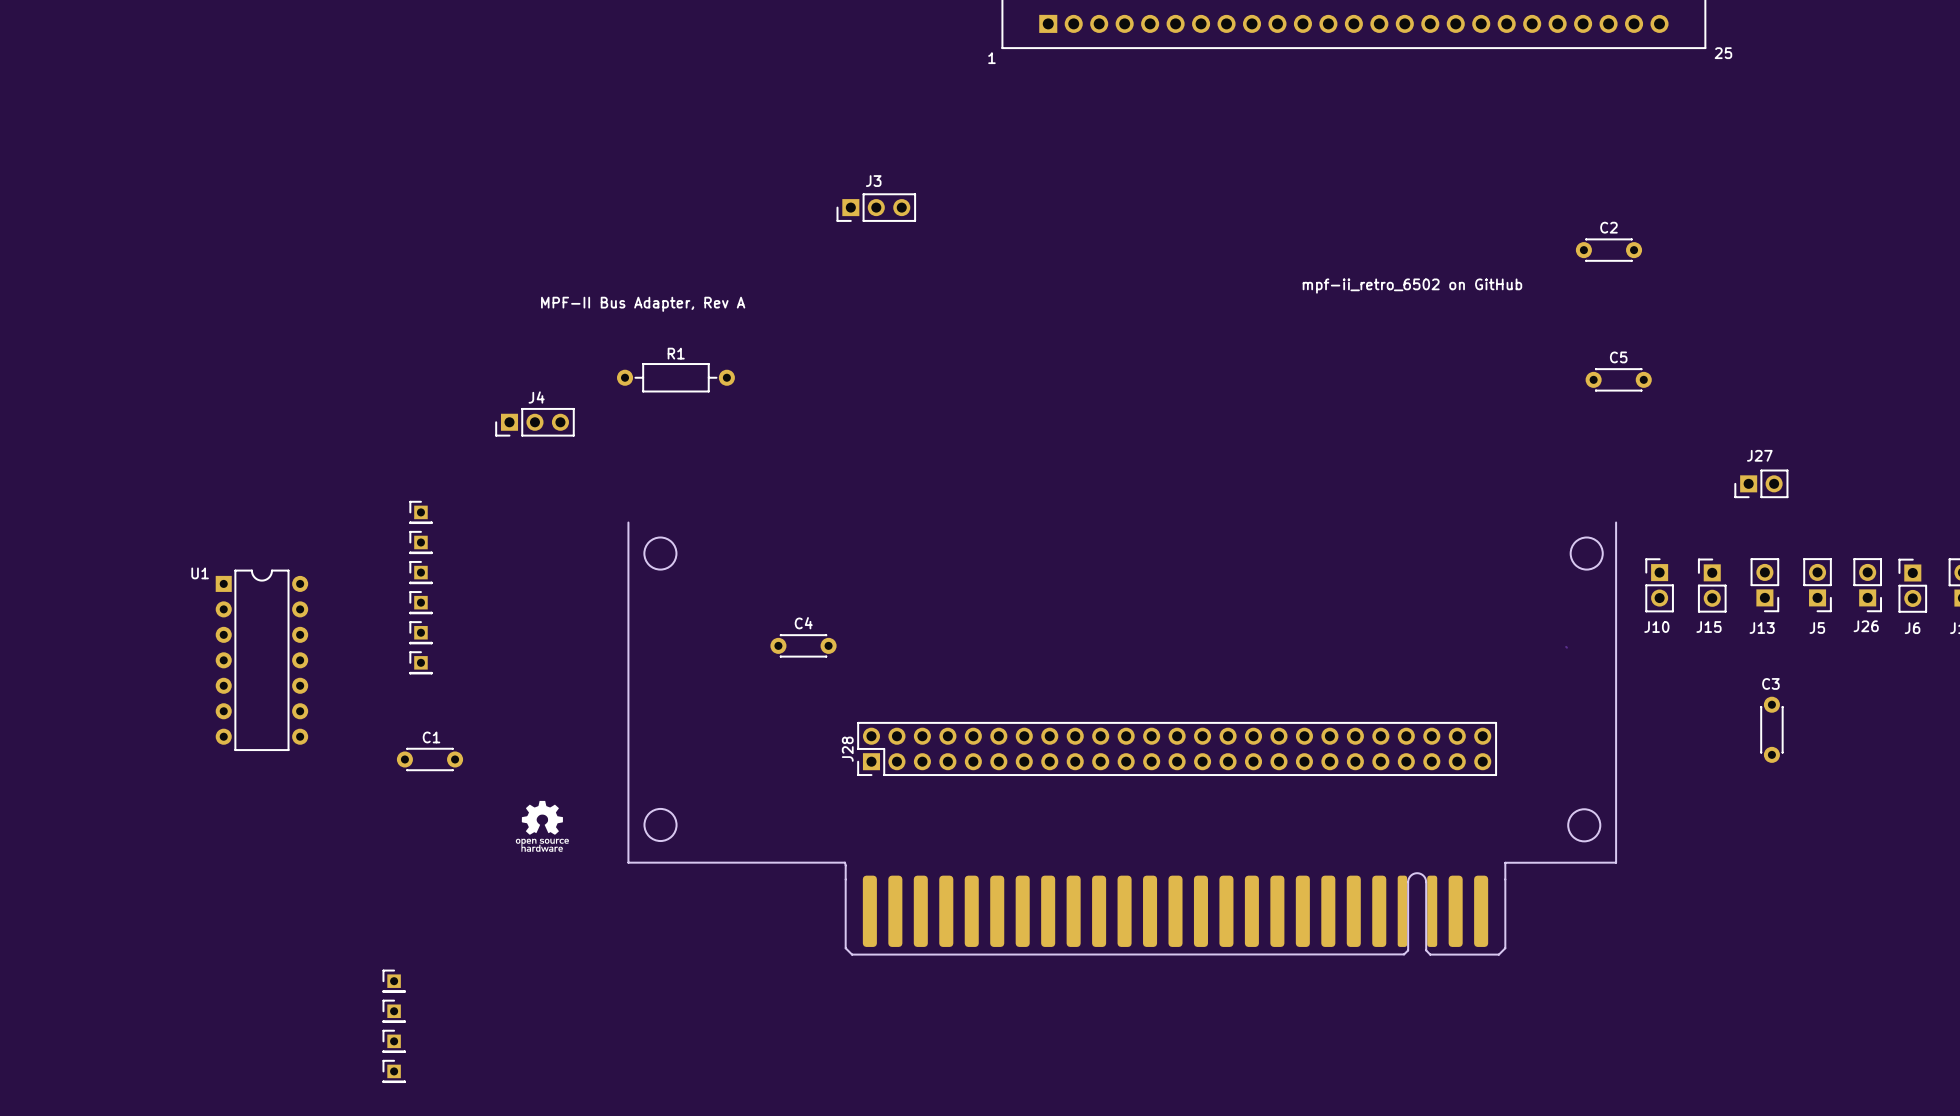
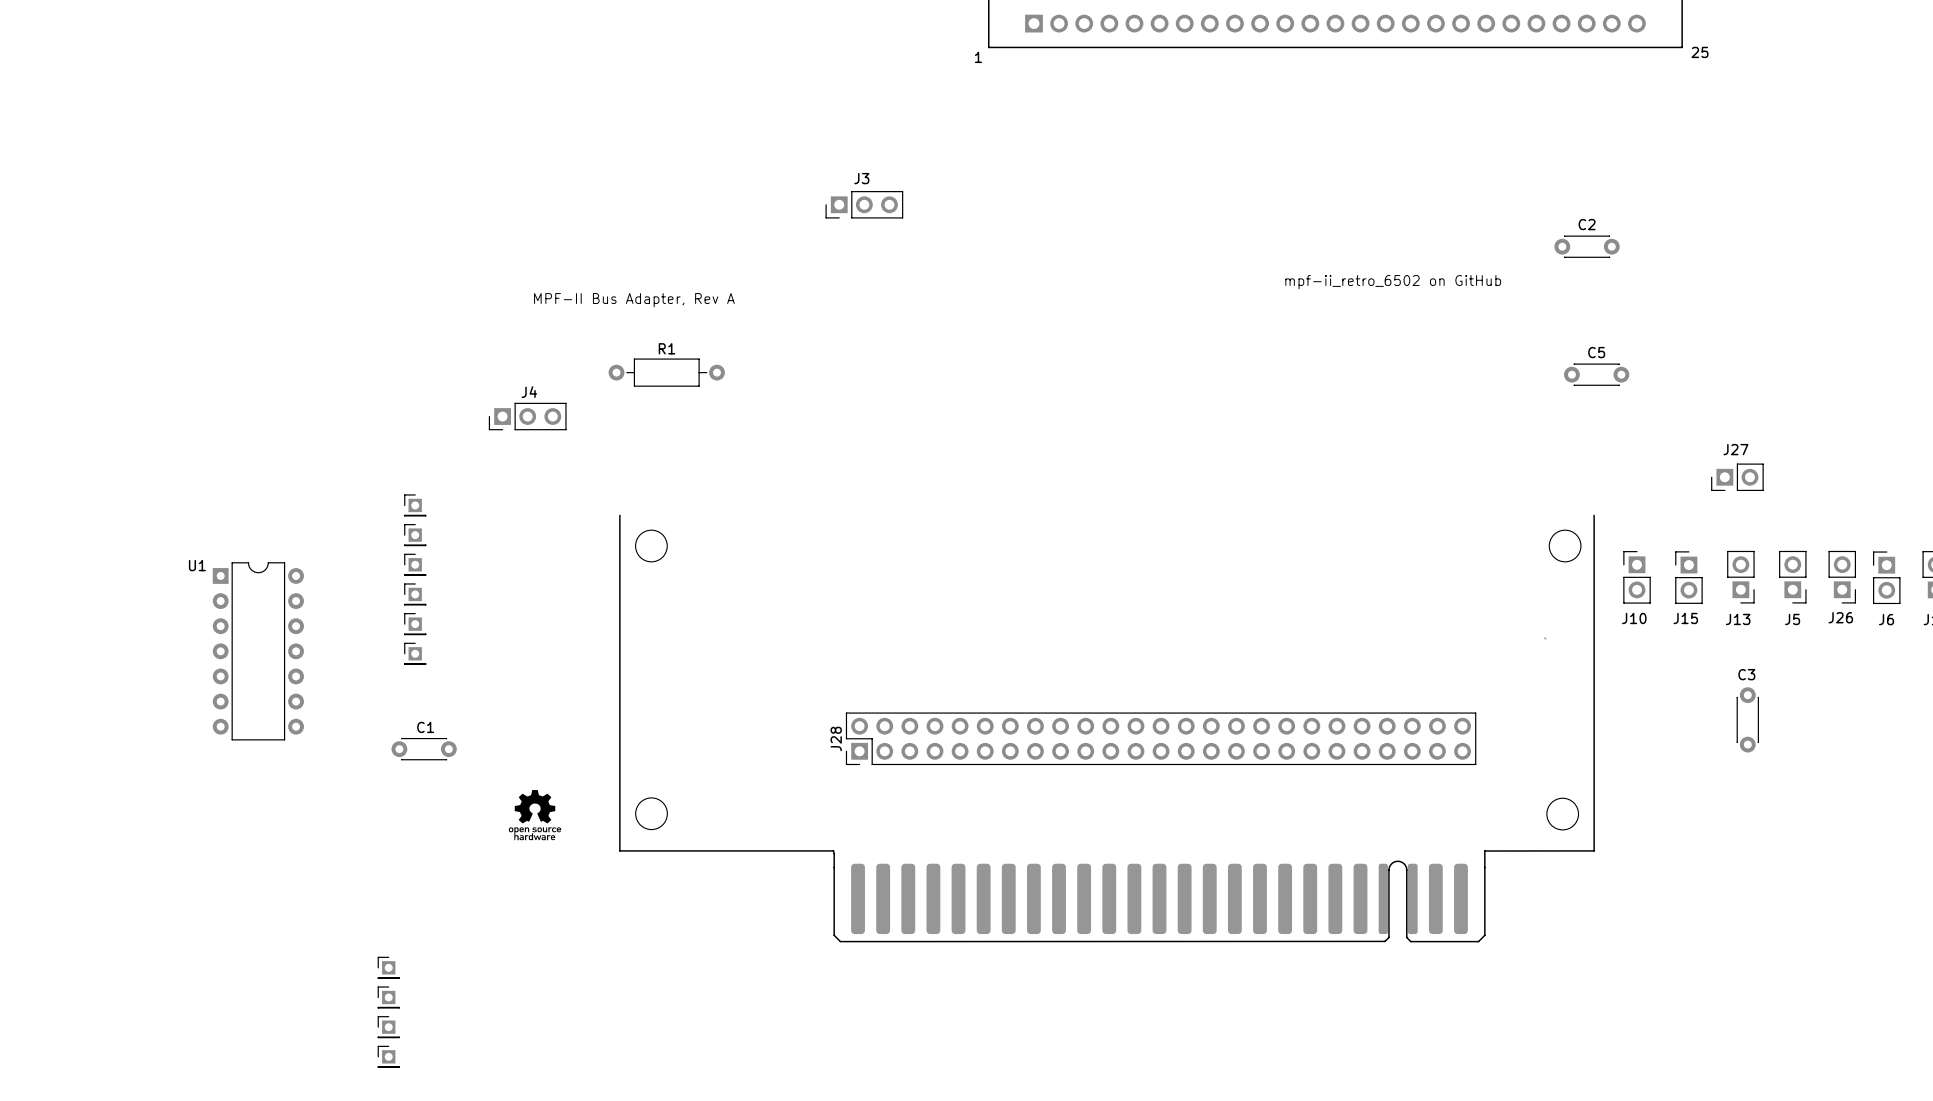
C4: (803, 645) -> none

